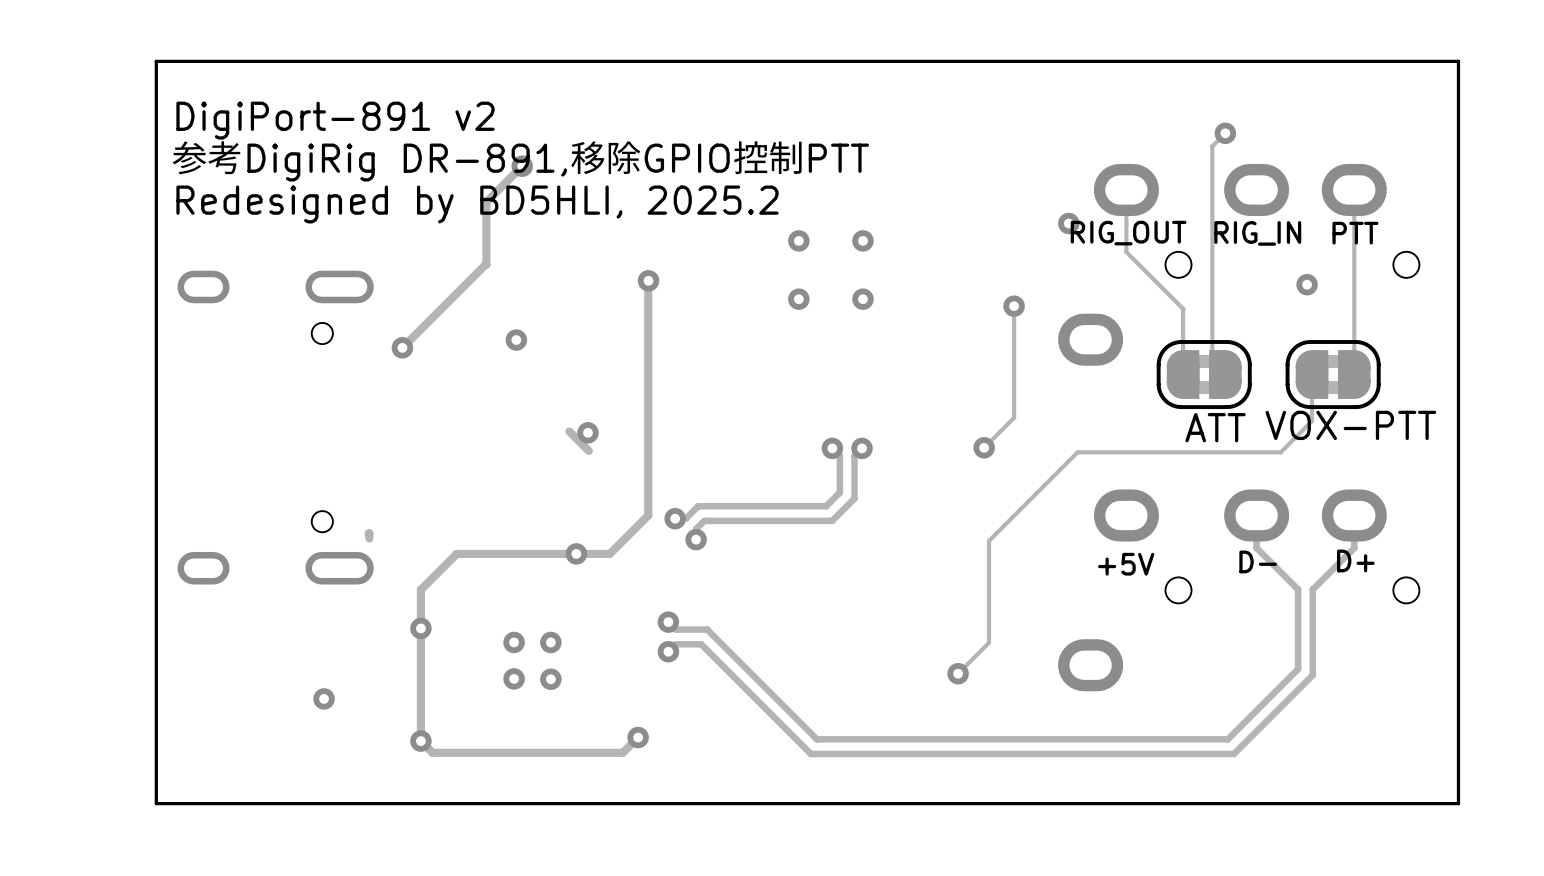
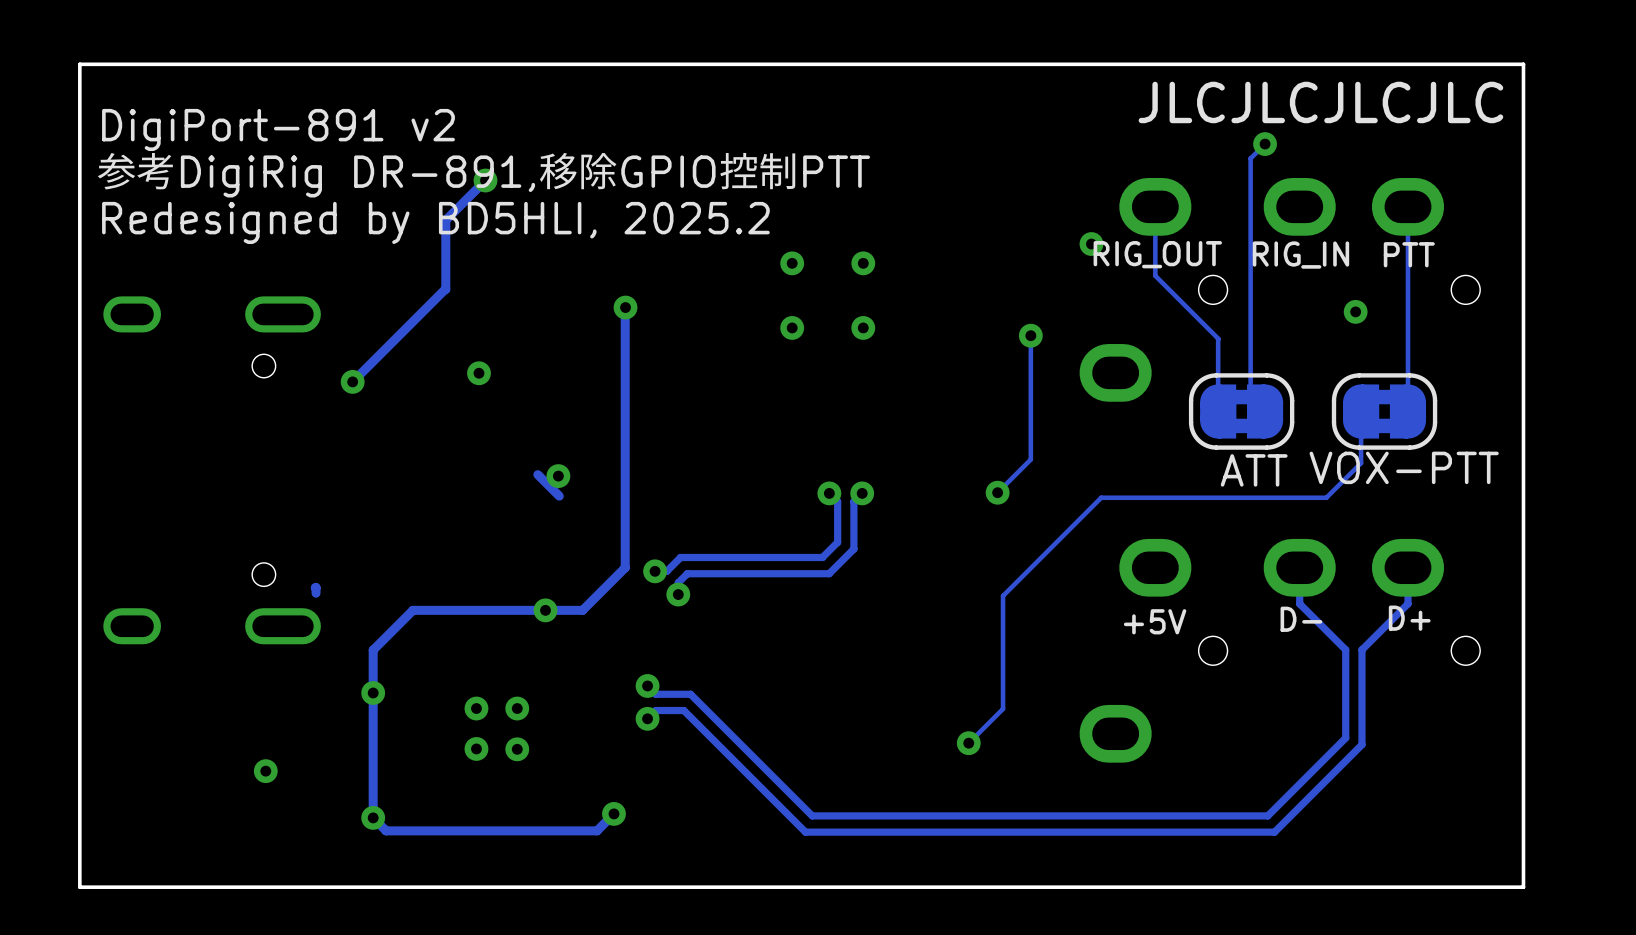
text: none -> JLCJLCJLCJLC (1320, 102)

